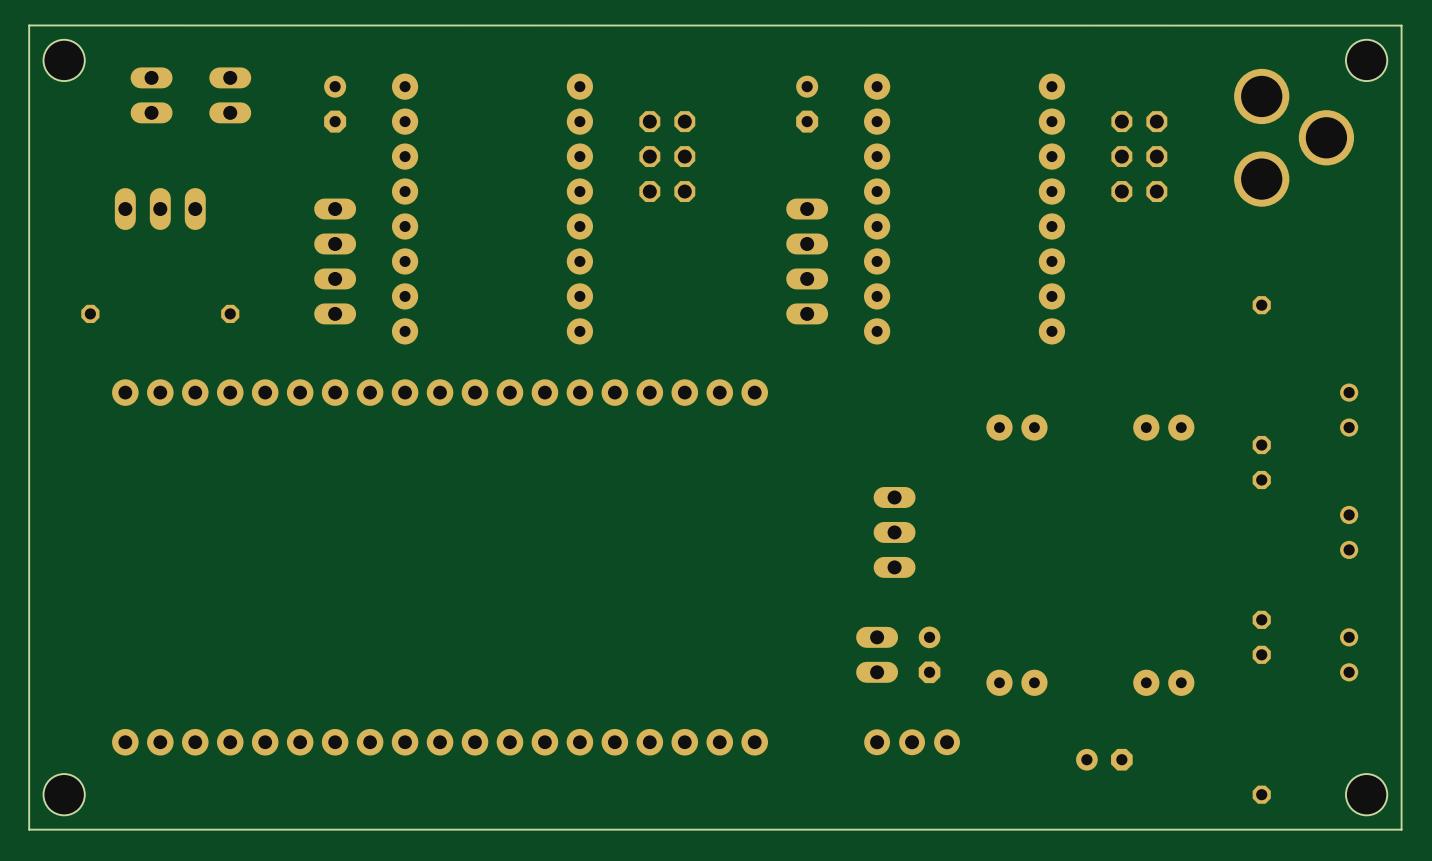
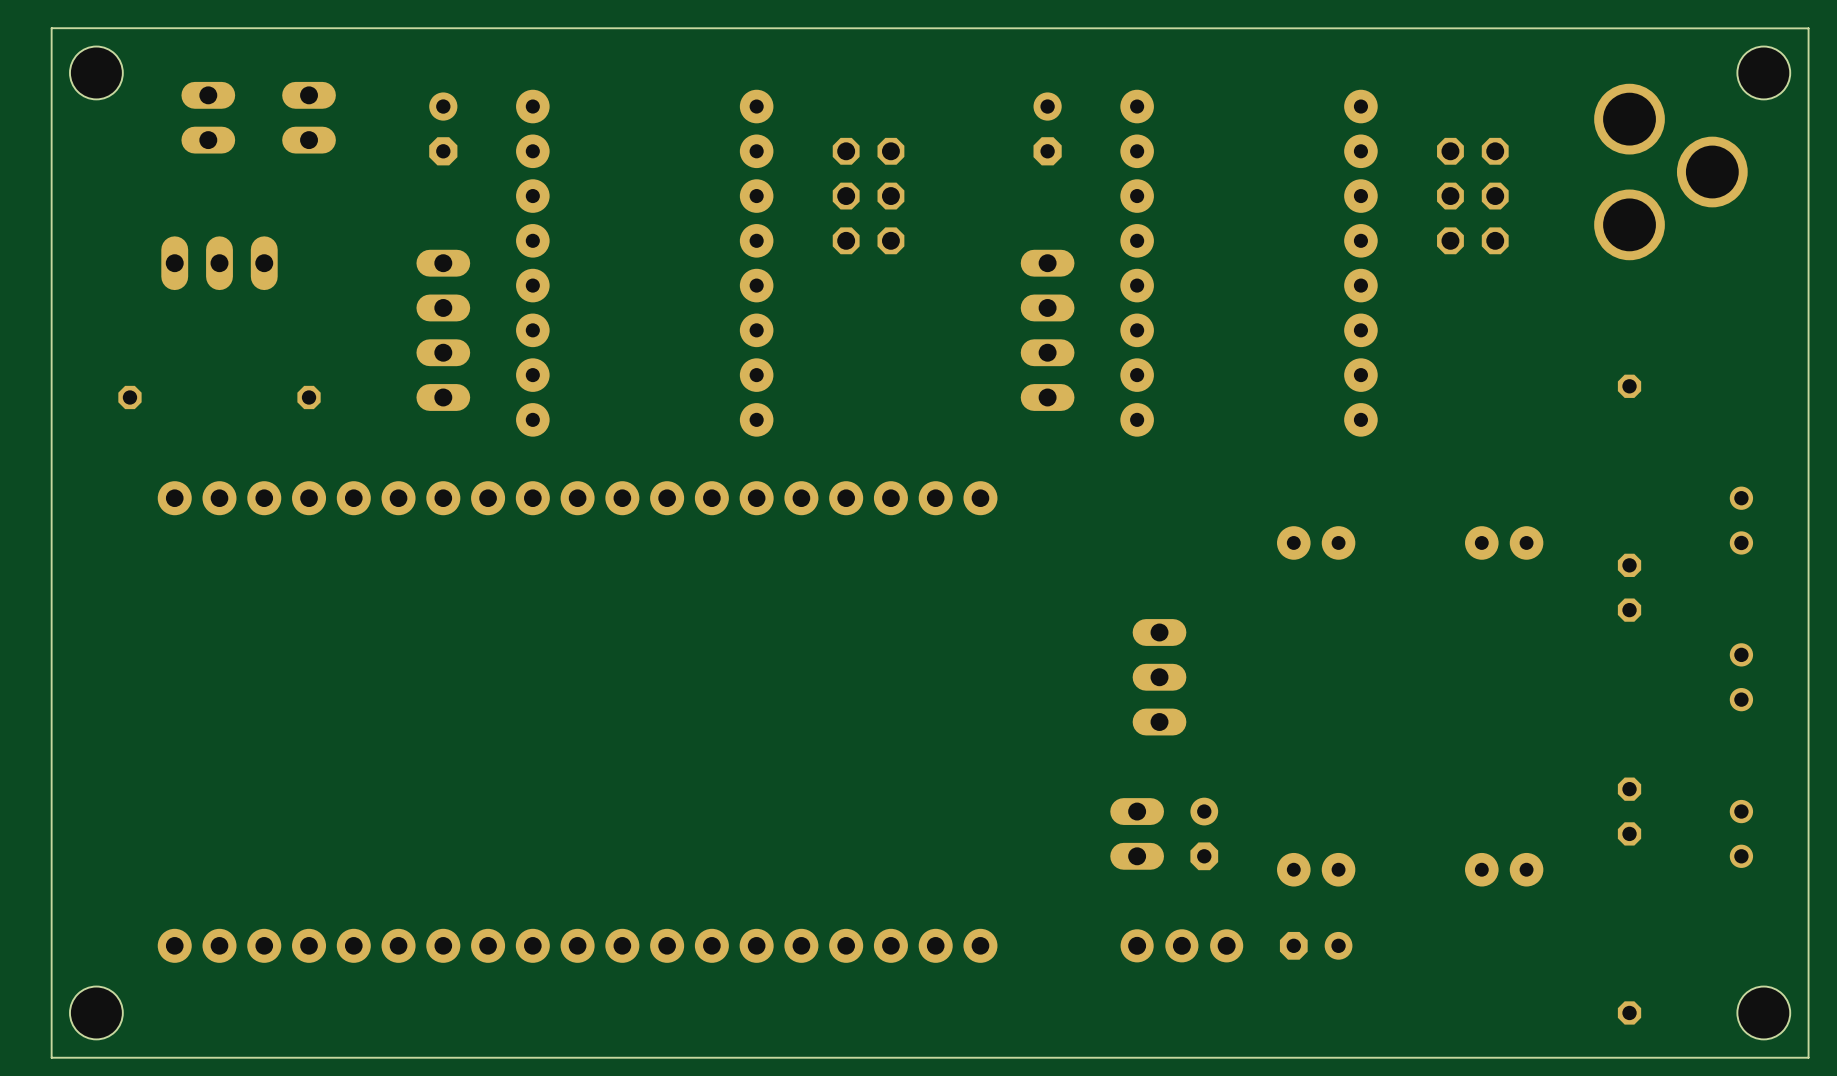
part rotation: 0° (1104, 759) -> 180° (1316, 945)
part position: (1104, 759) -> (1316, 945)

